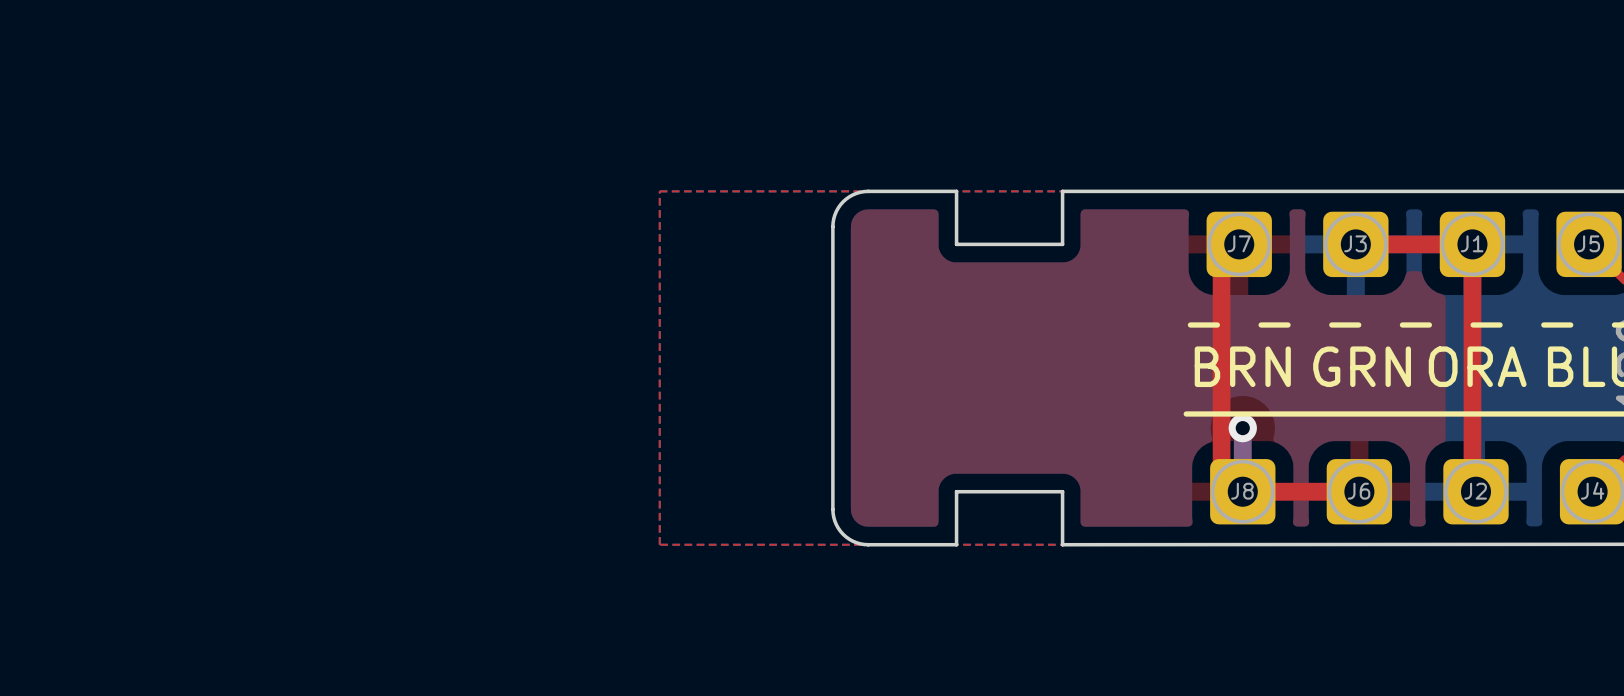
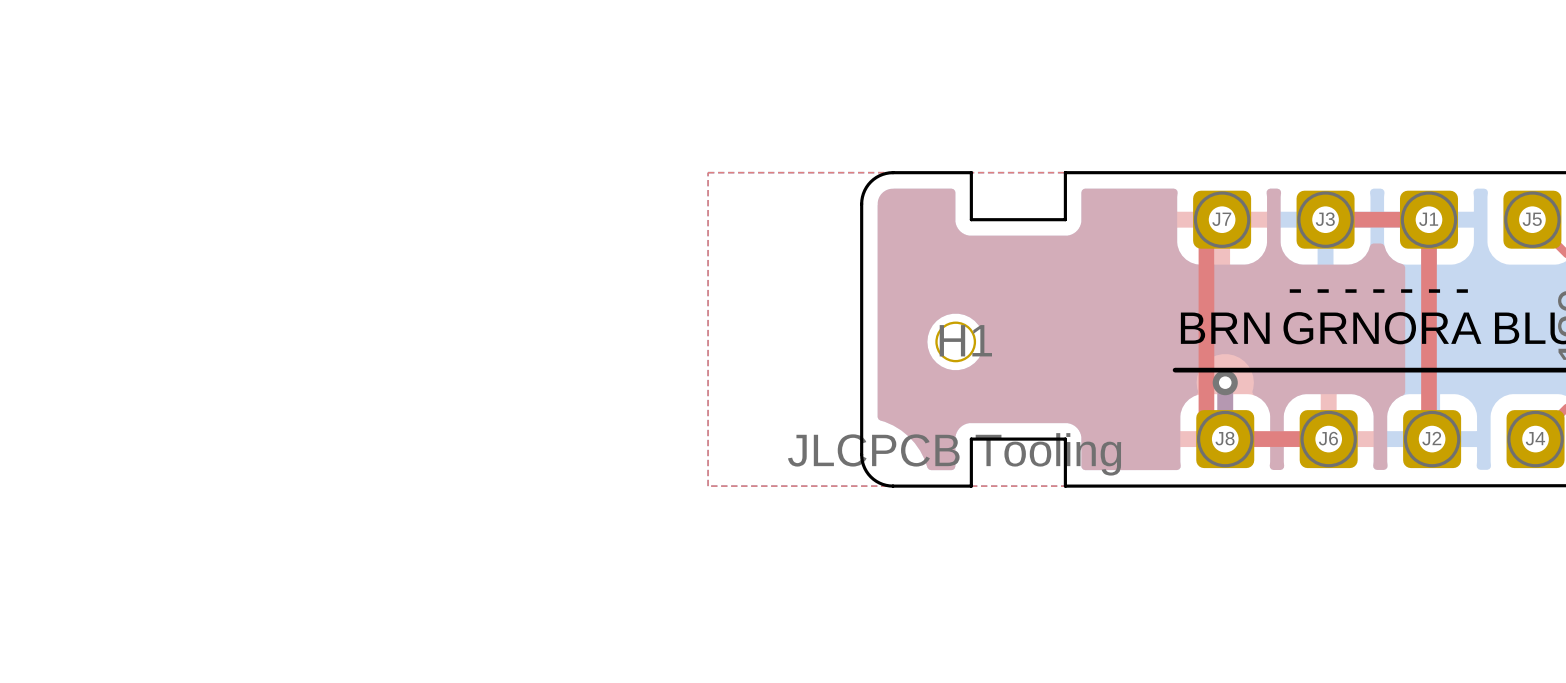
H1: none -> JLCPCB Tooling (955, 341)

